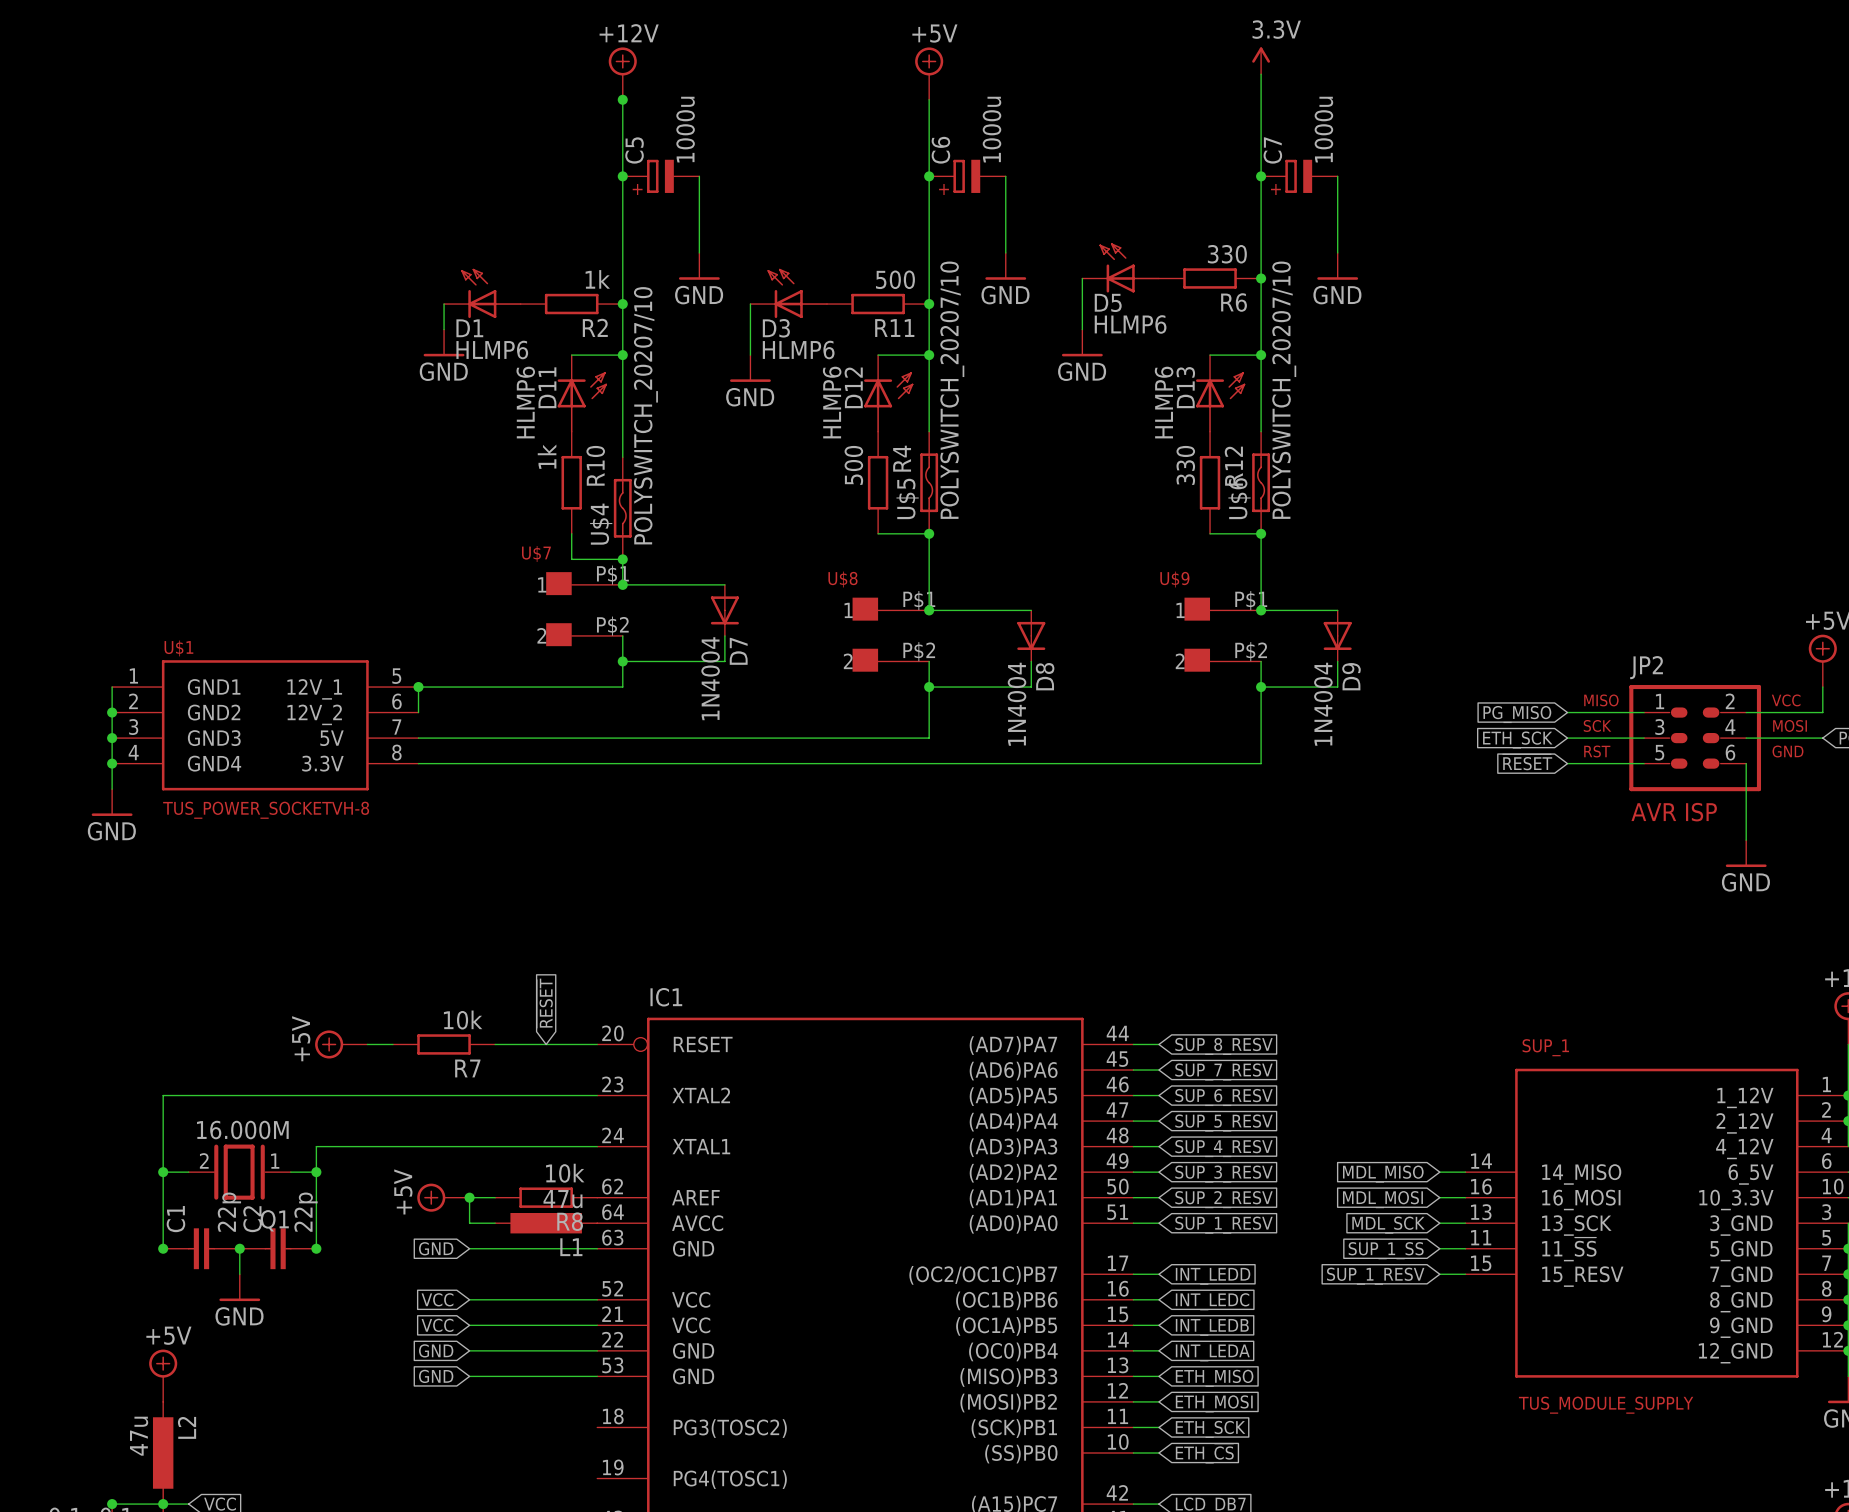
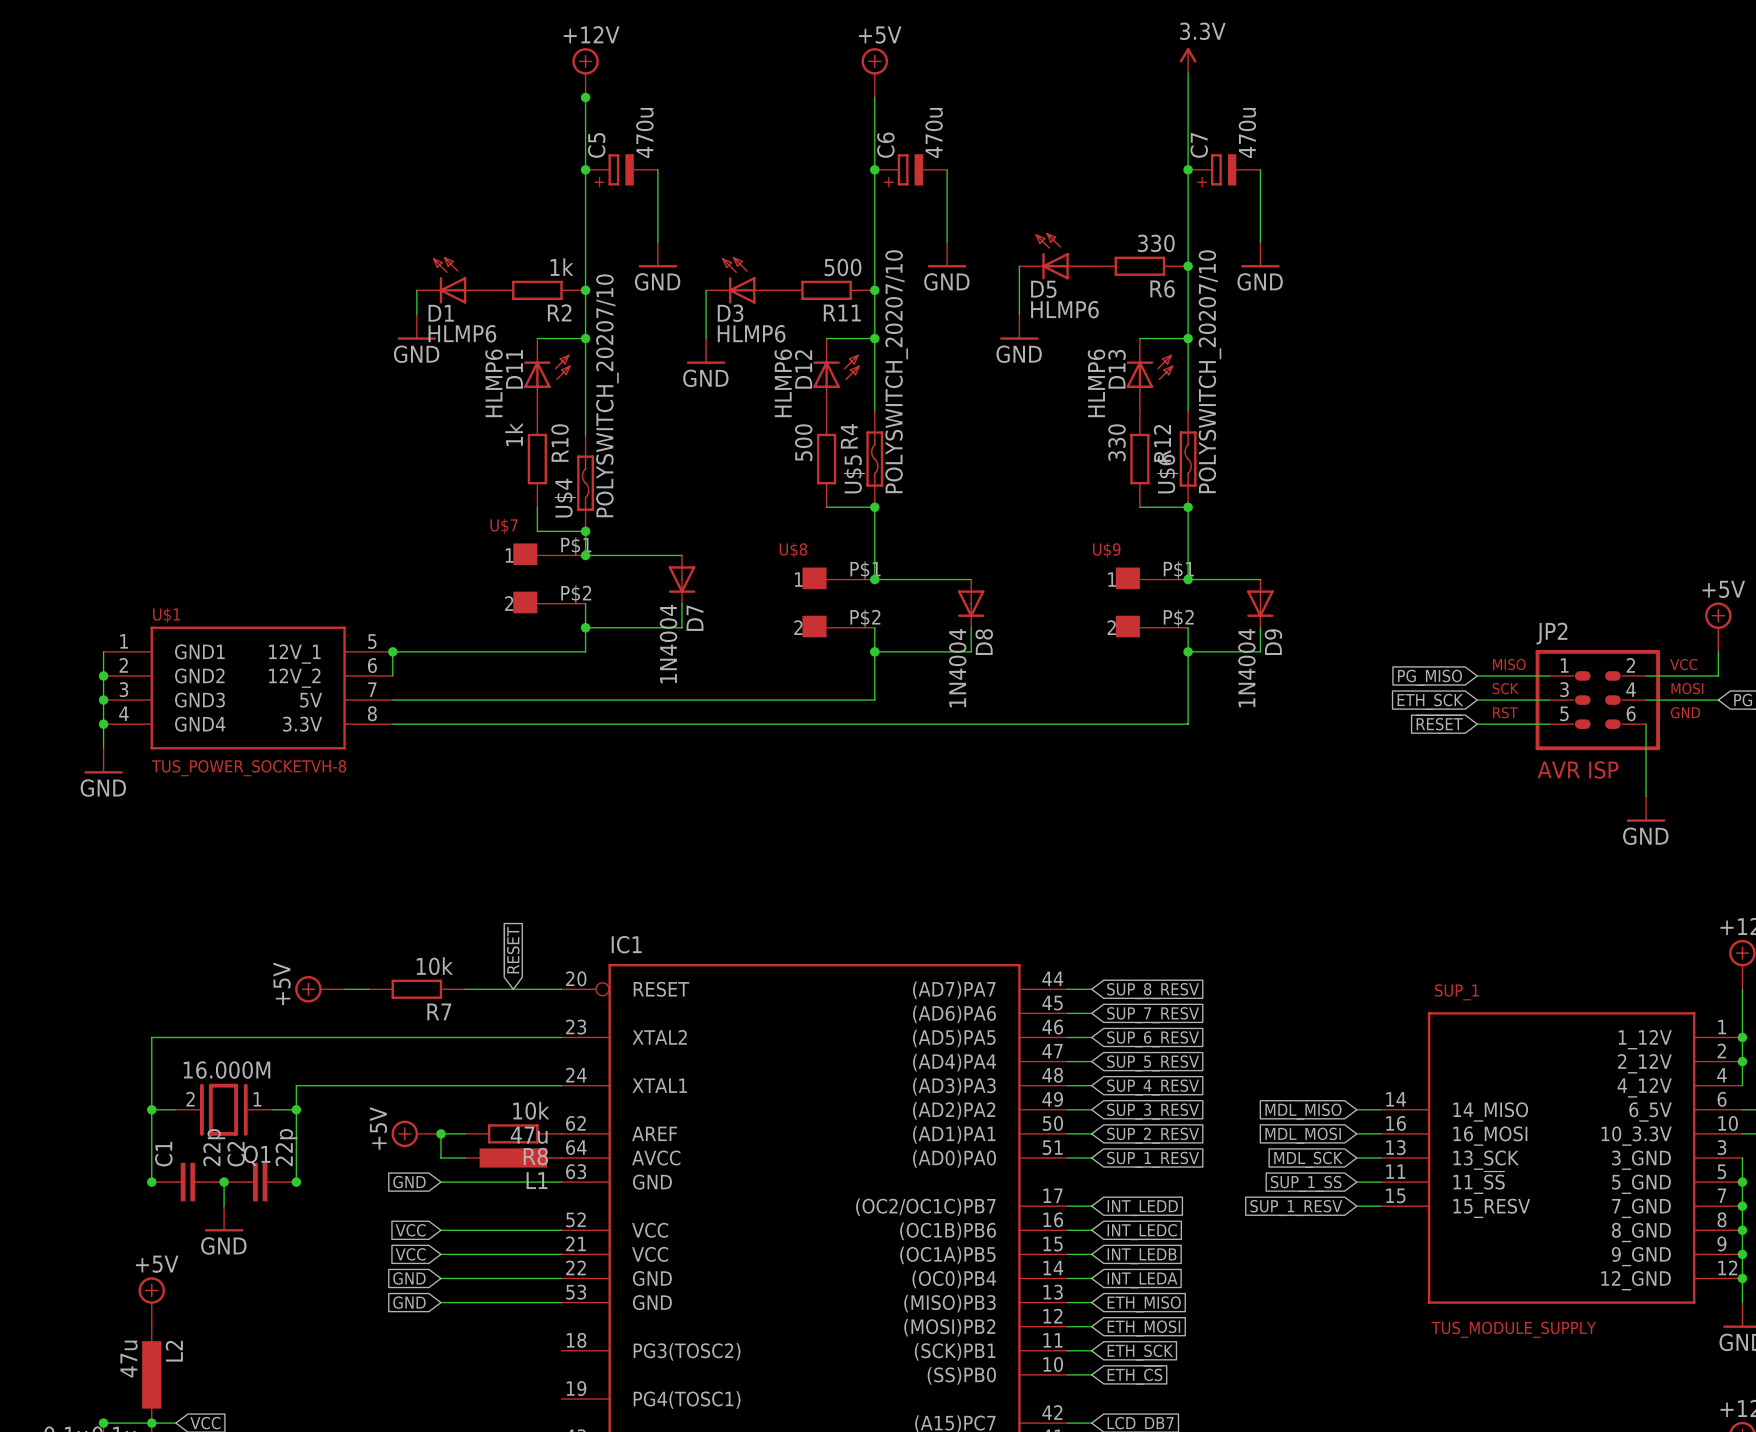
C5 value: 1000u (685, 129) -> 470u (644, 132)
C6 value: 1000u (991, 129) -> 470u (934, 132)
C7 value: 1000u (1323, 129) -> 470u (1247, 132)

